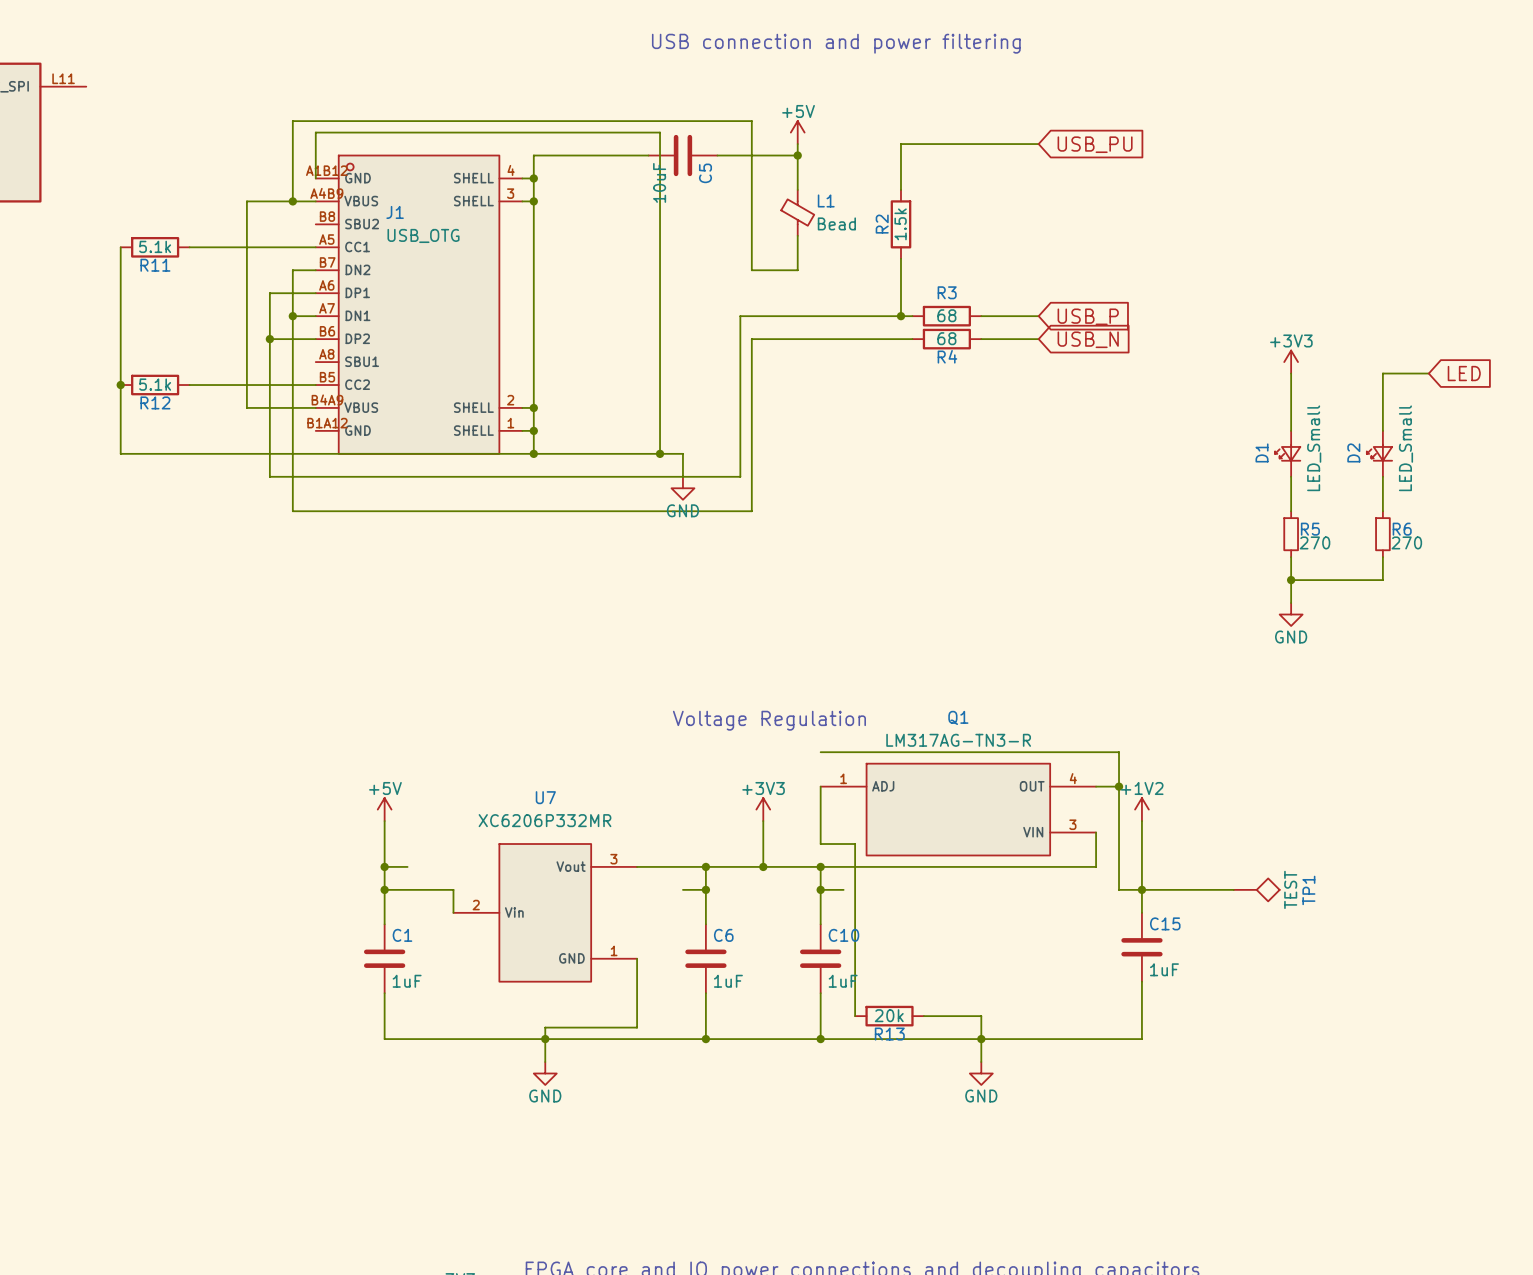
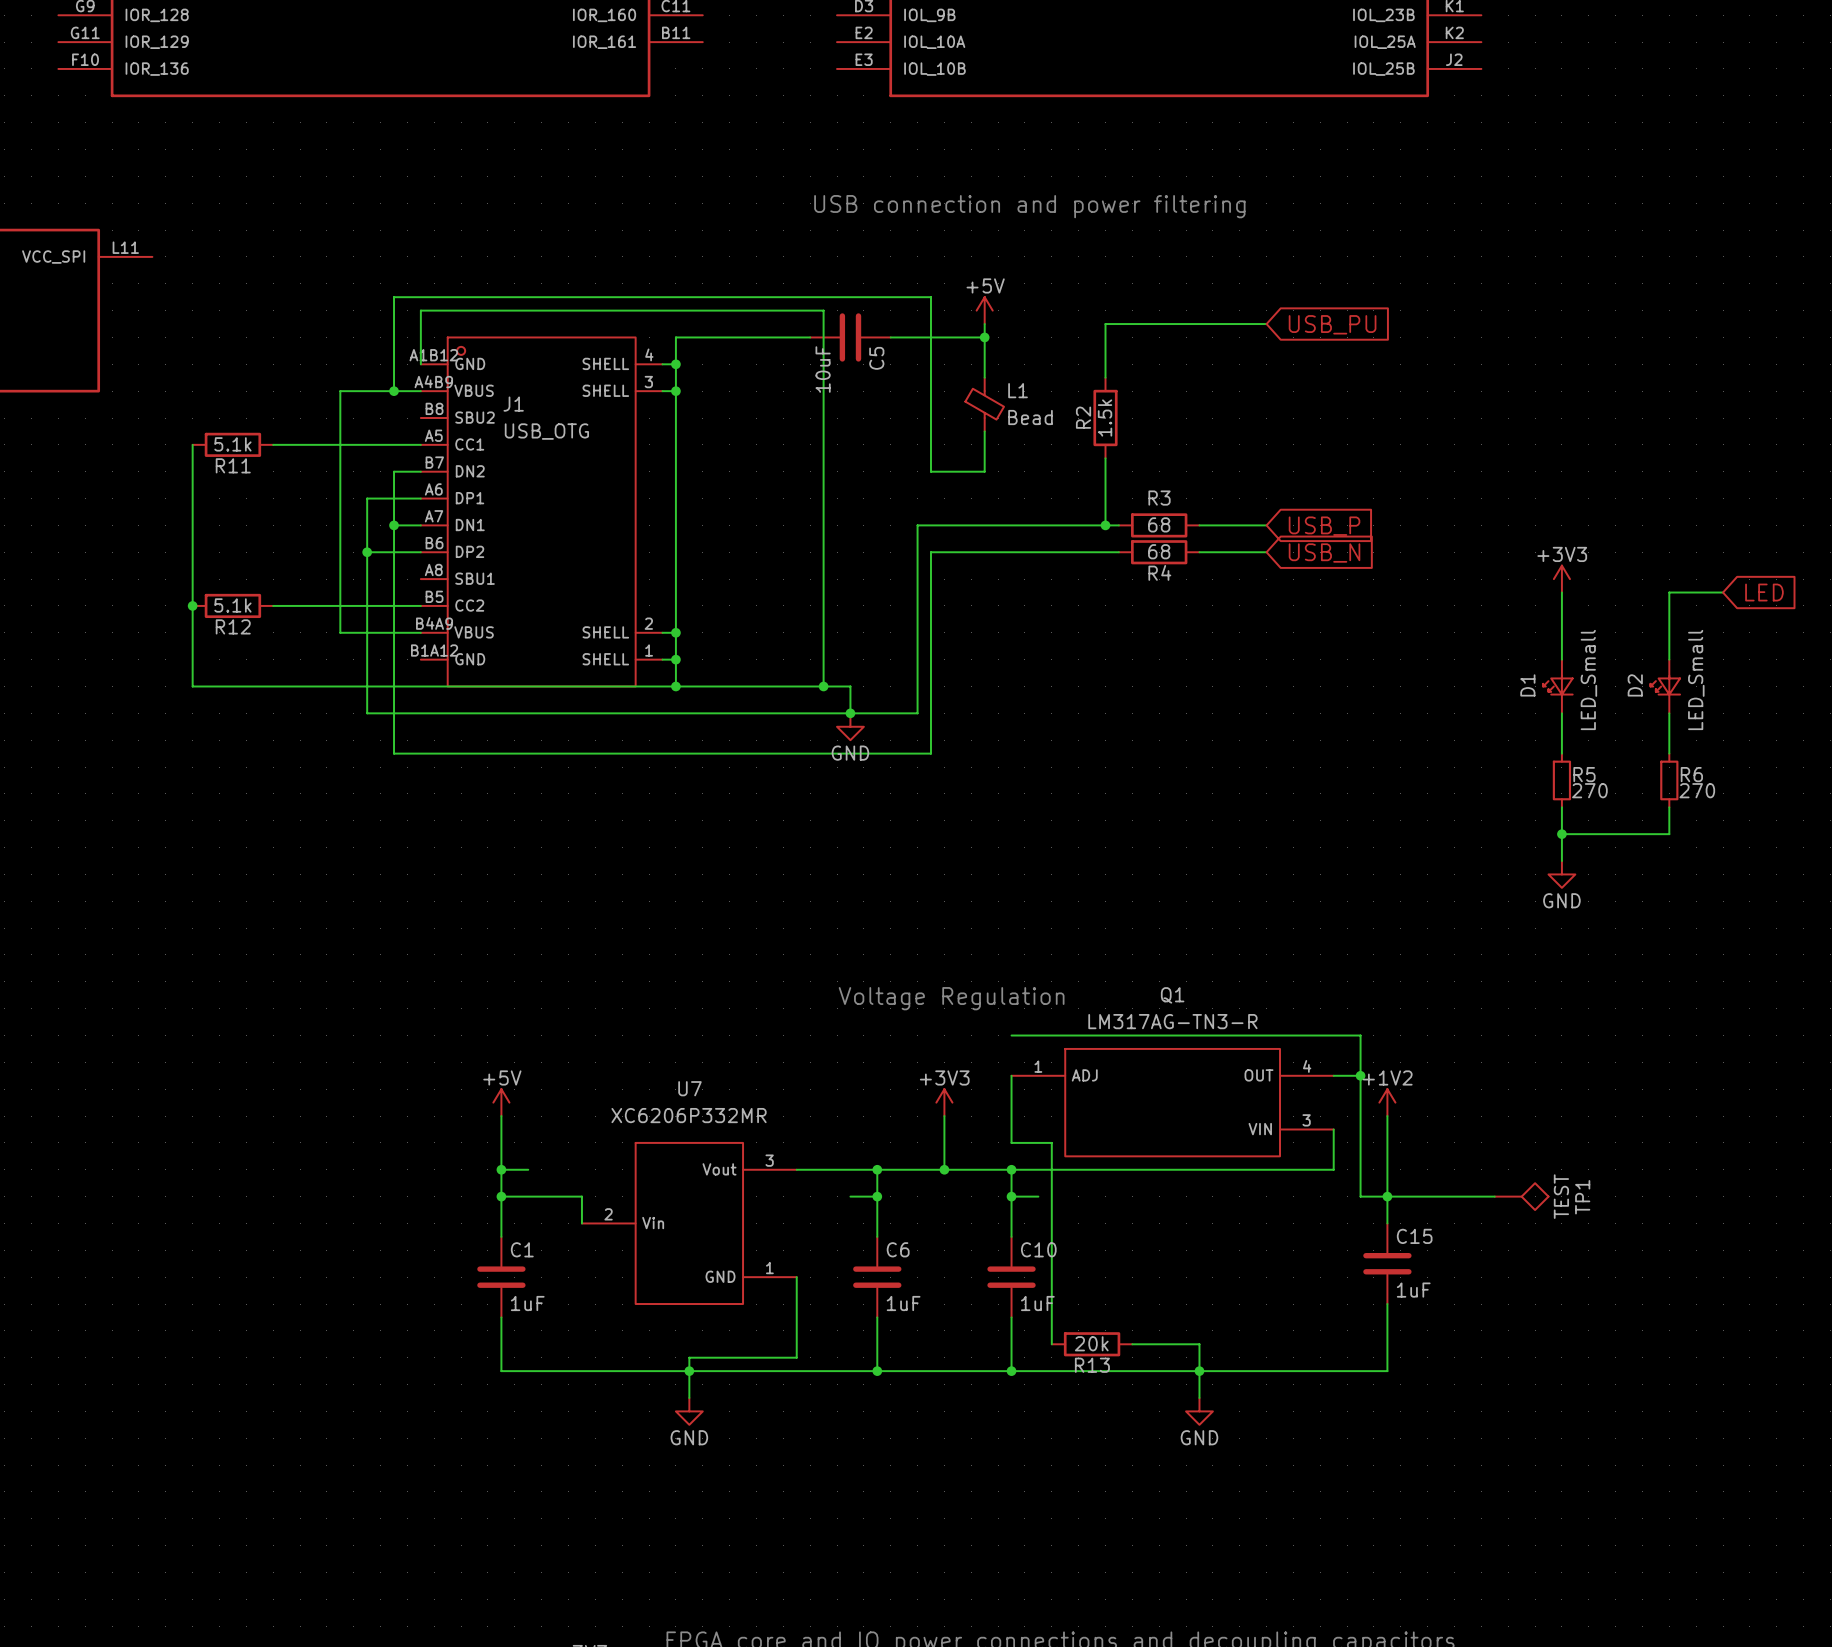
junction: none -> (850, 713)

